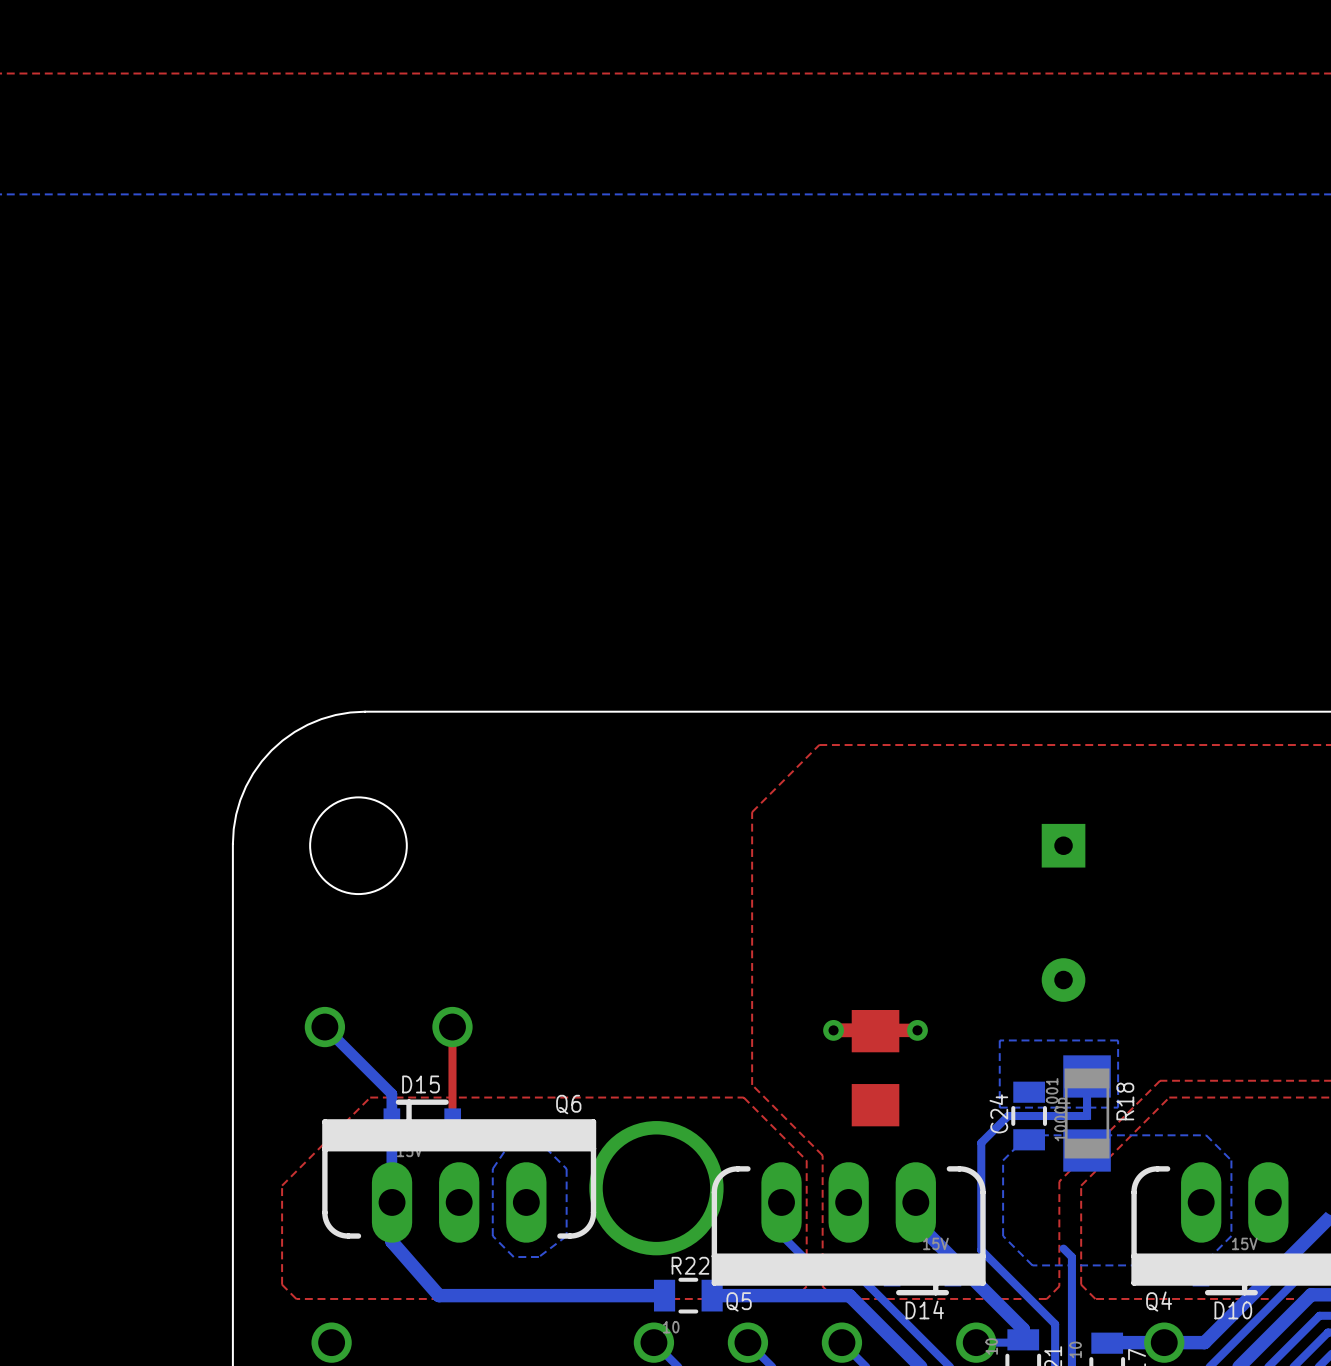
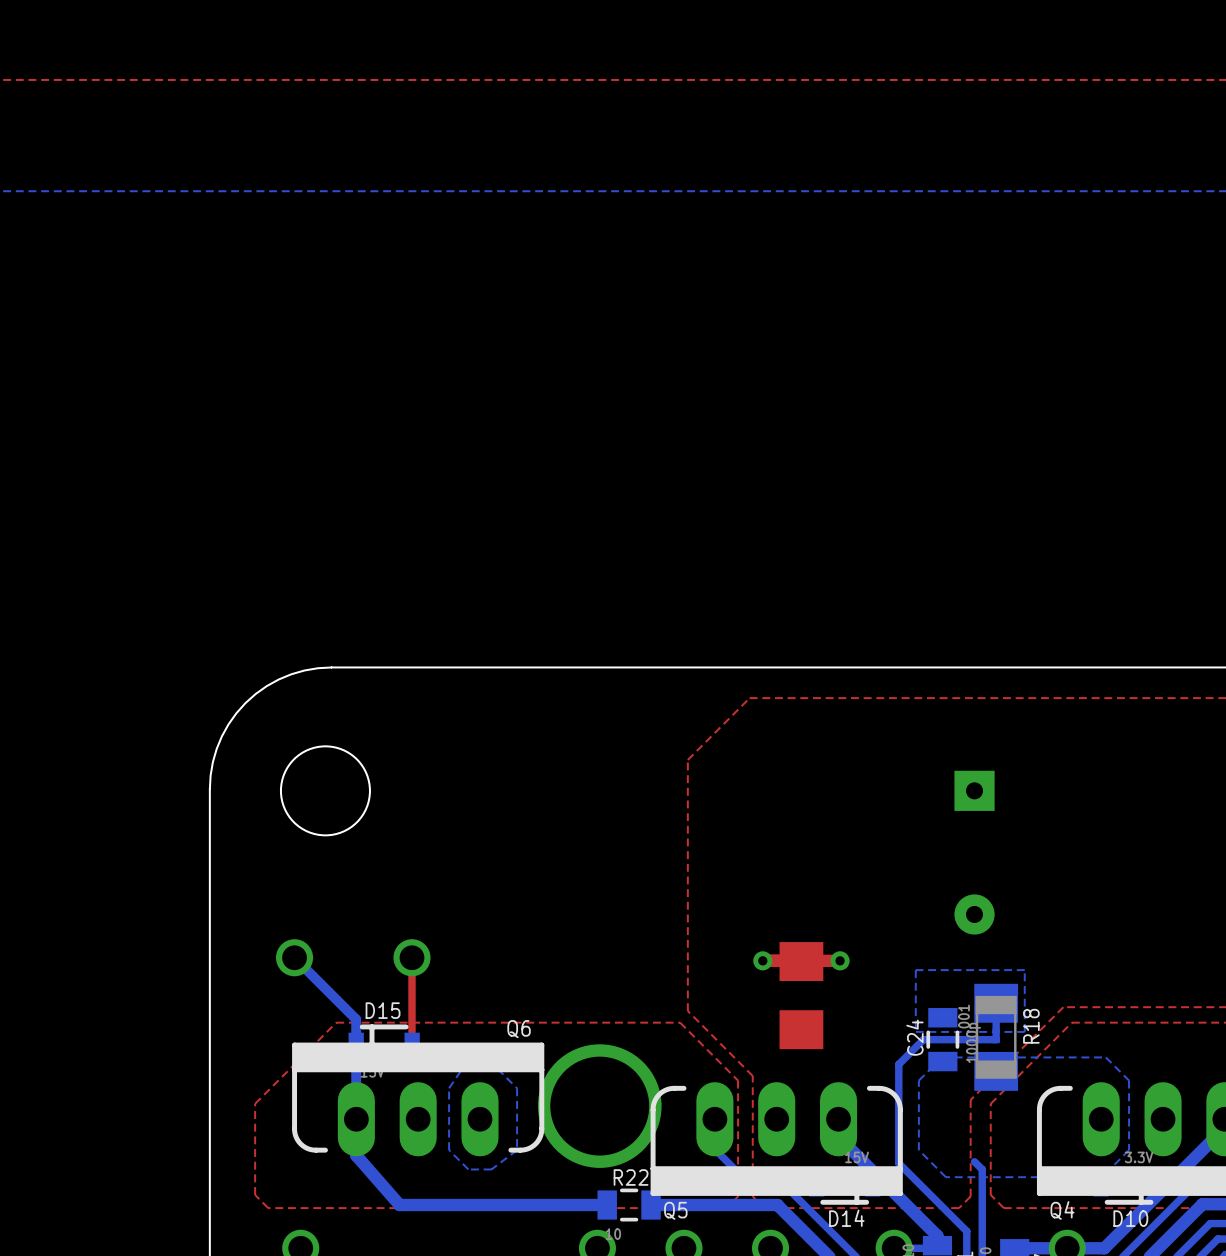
D10 value: 15V (1244, 1243) -> 3.3V (1139, 1157)

